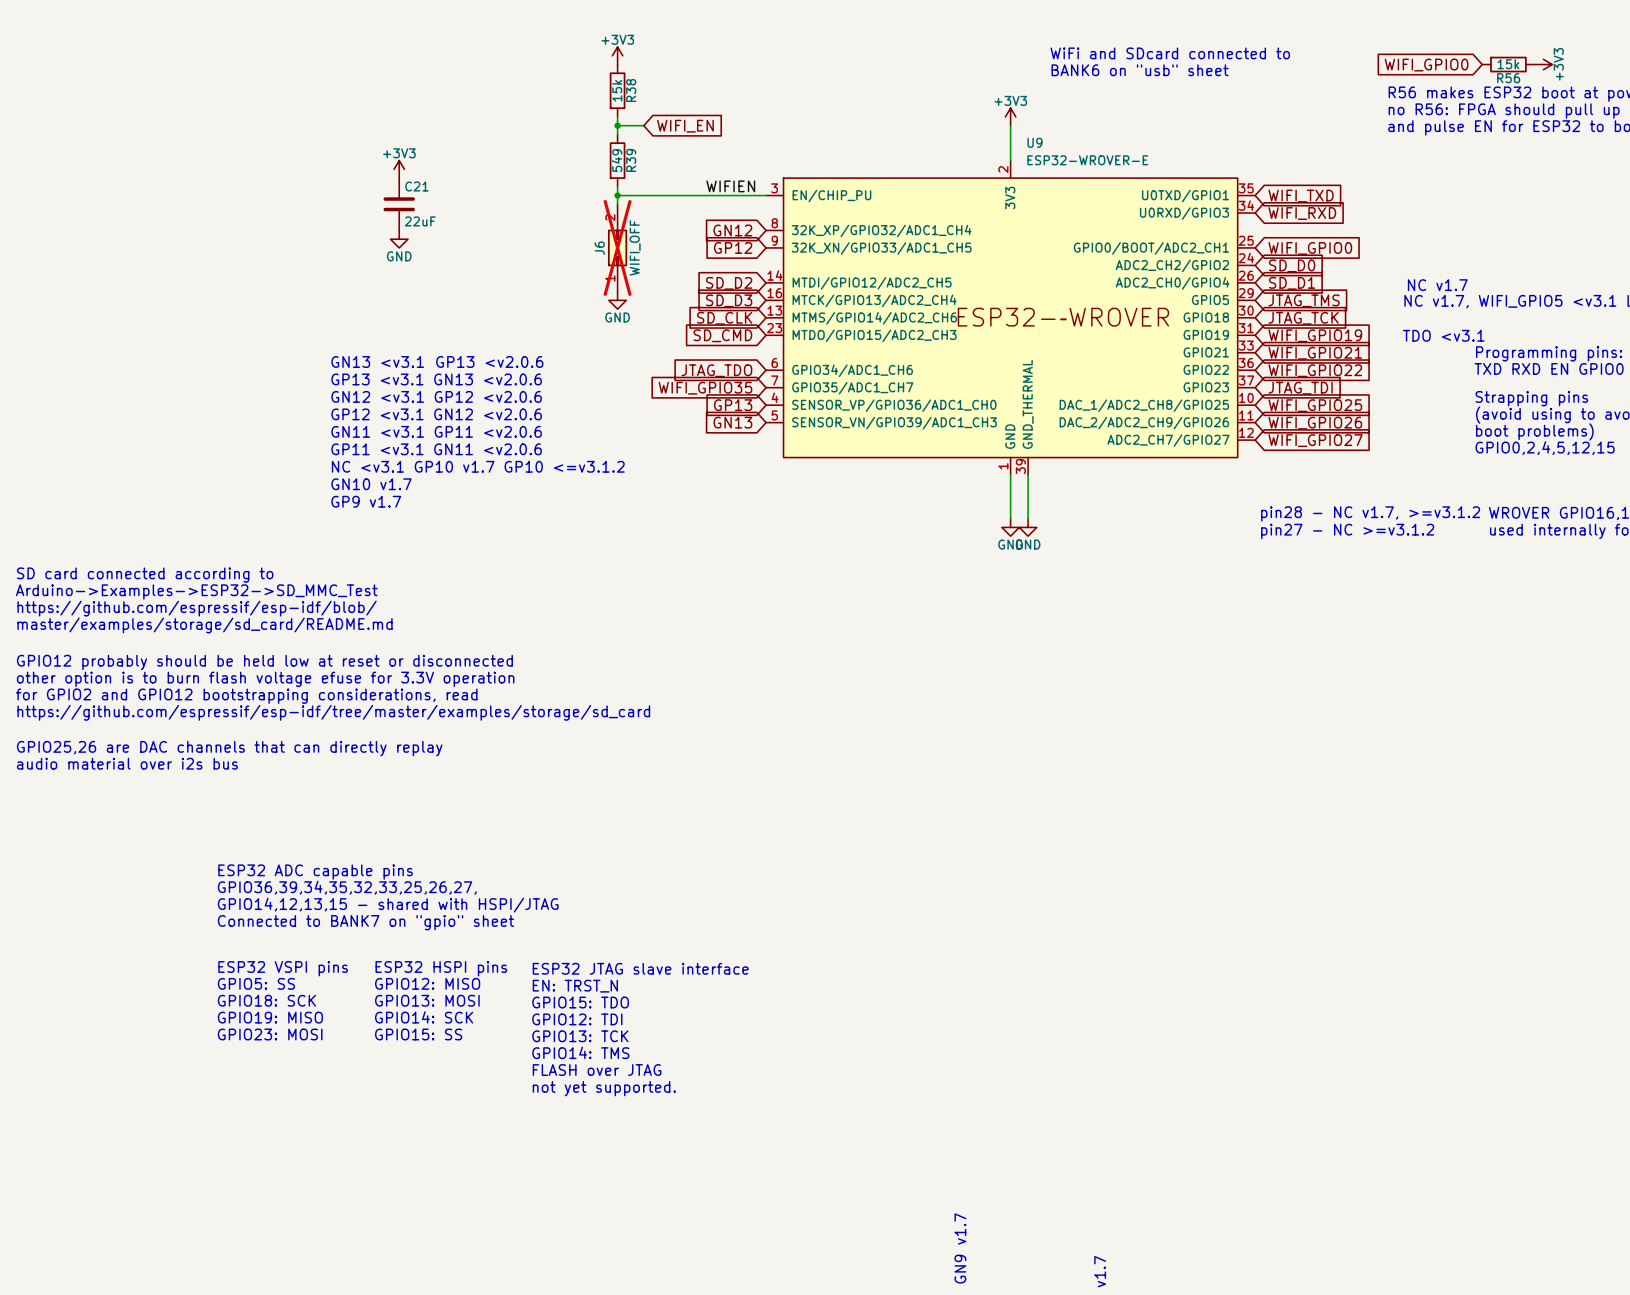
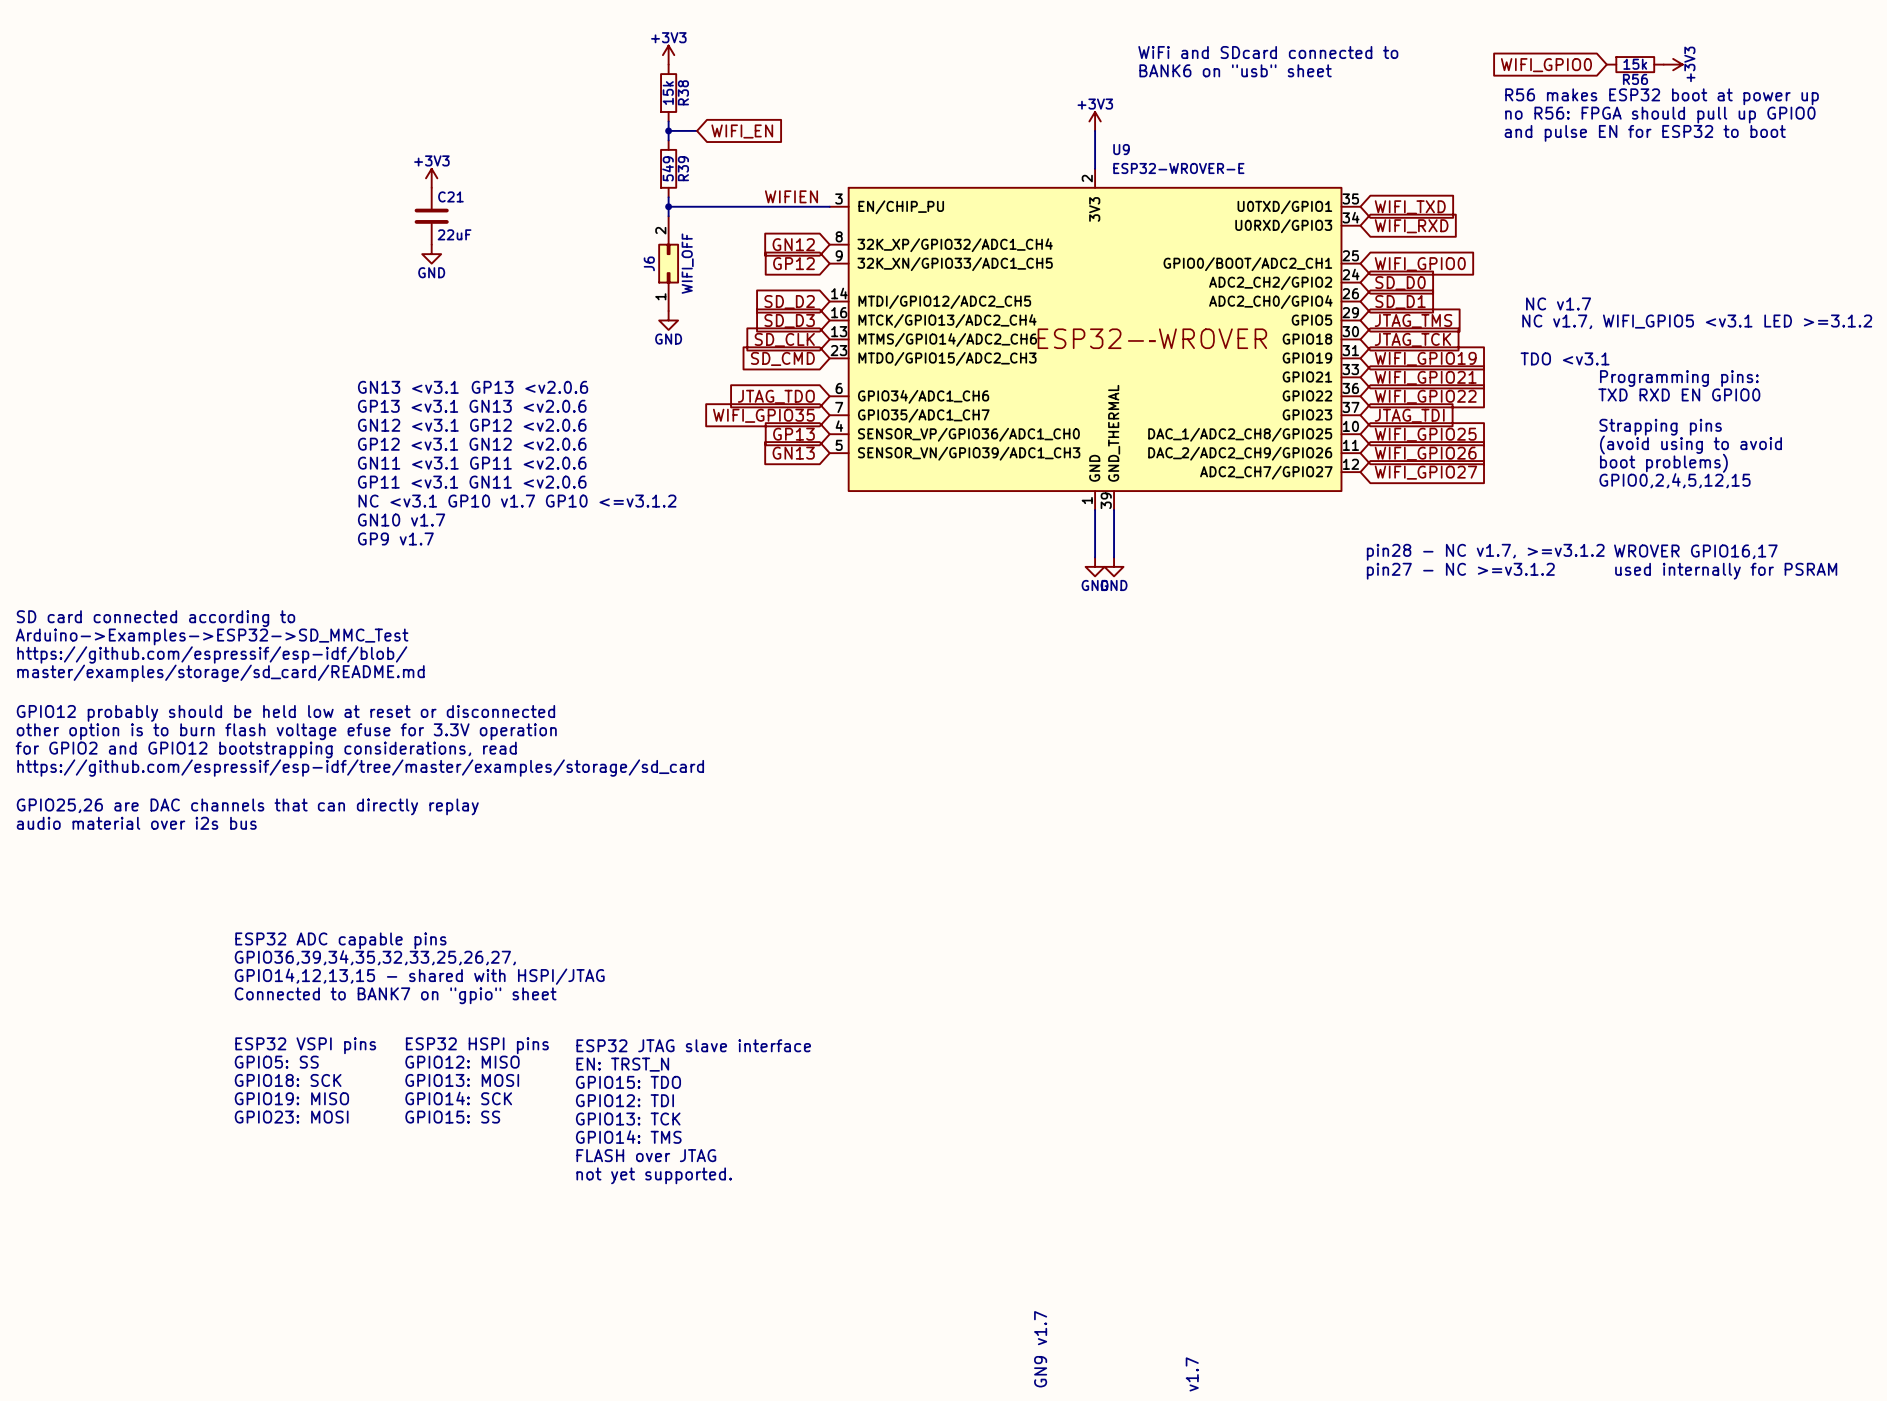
J6 do-not-place cross: (617, 247) -> none

